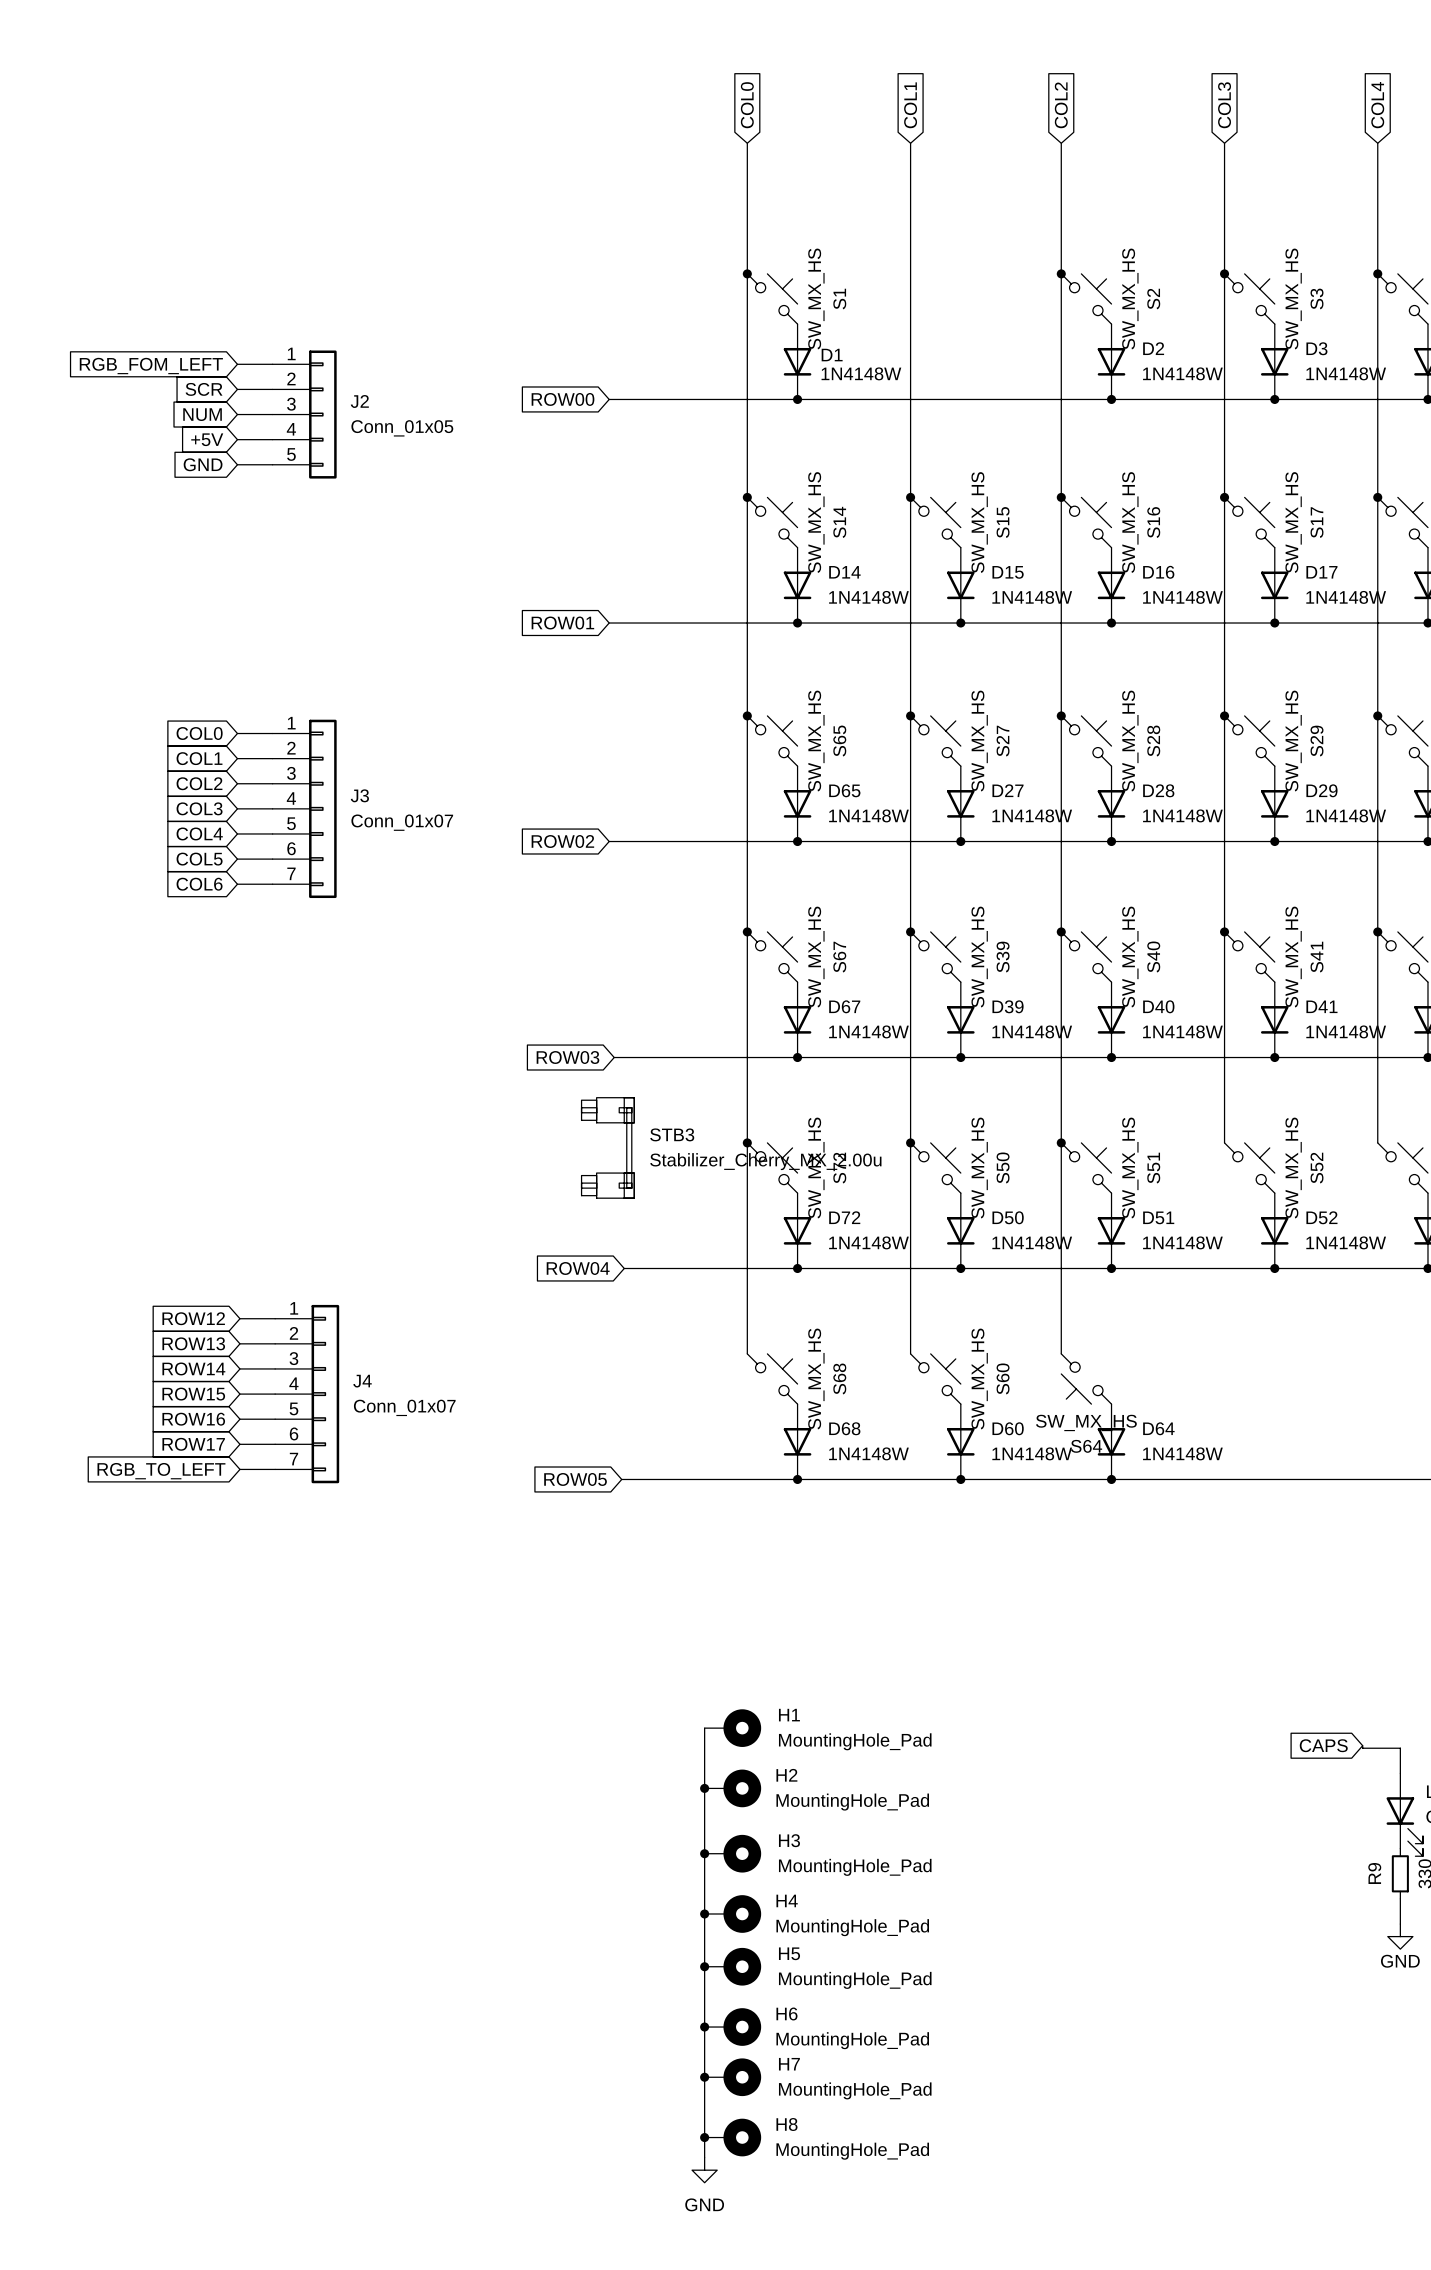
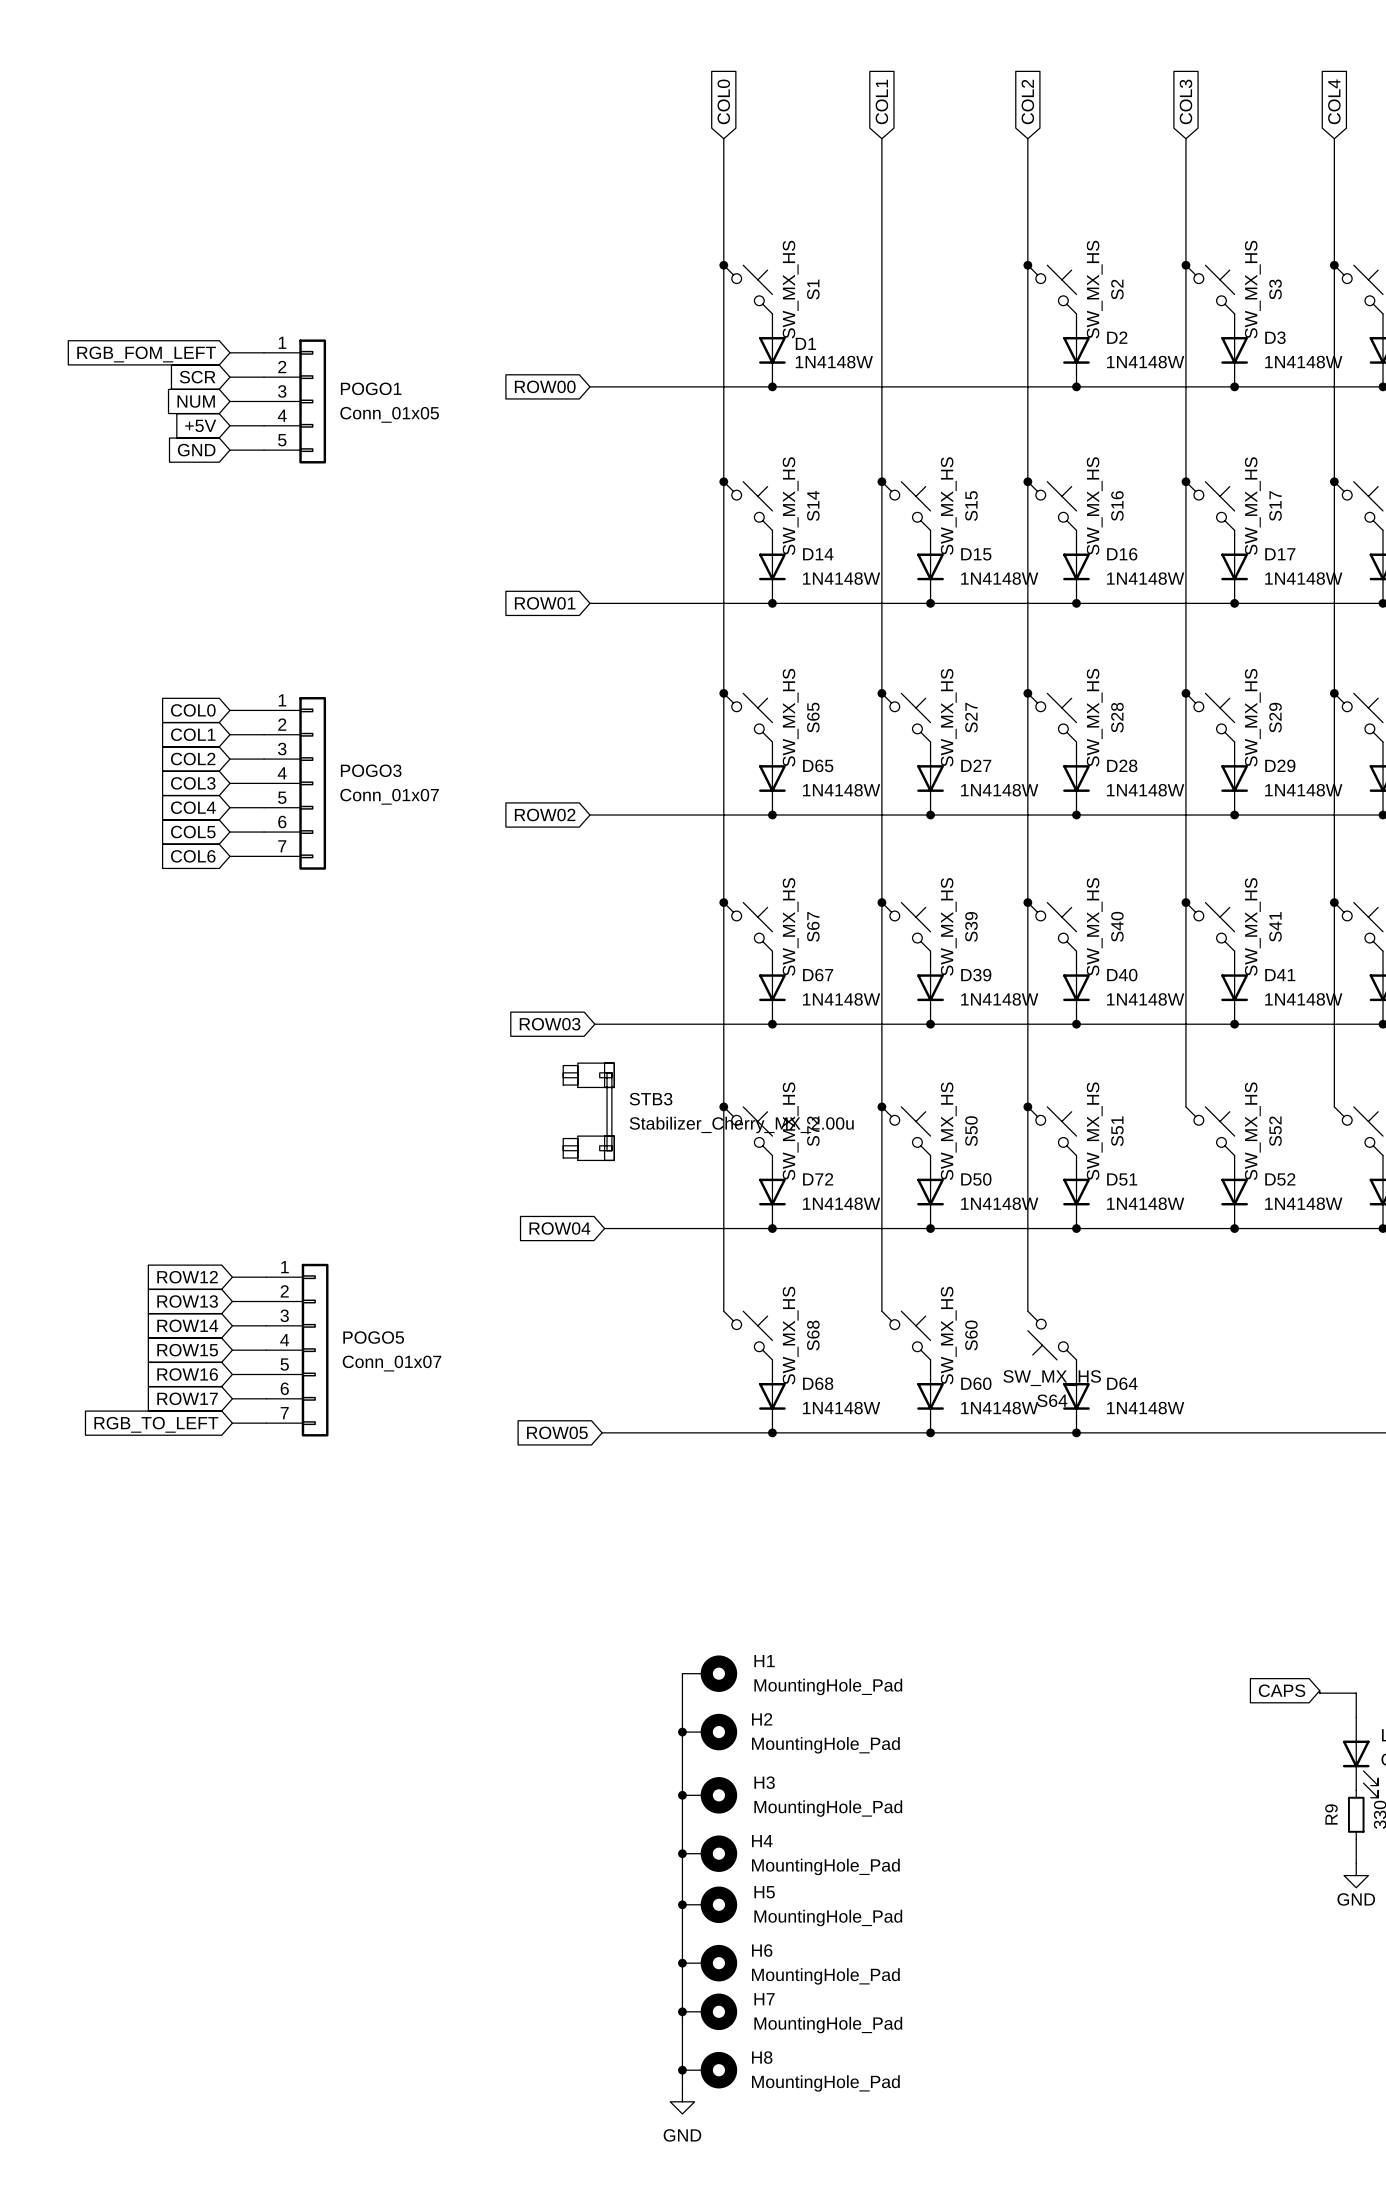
J2 name: J2 (359, 401) -> POGO1 (371, 388)
J3 name: J3 (359, 795) -> POGO3 (371, 770)
J4 name: J4 (362, 1381) -> POGO5 (373, 1337)

